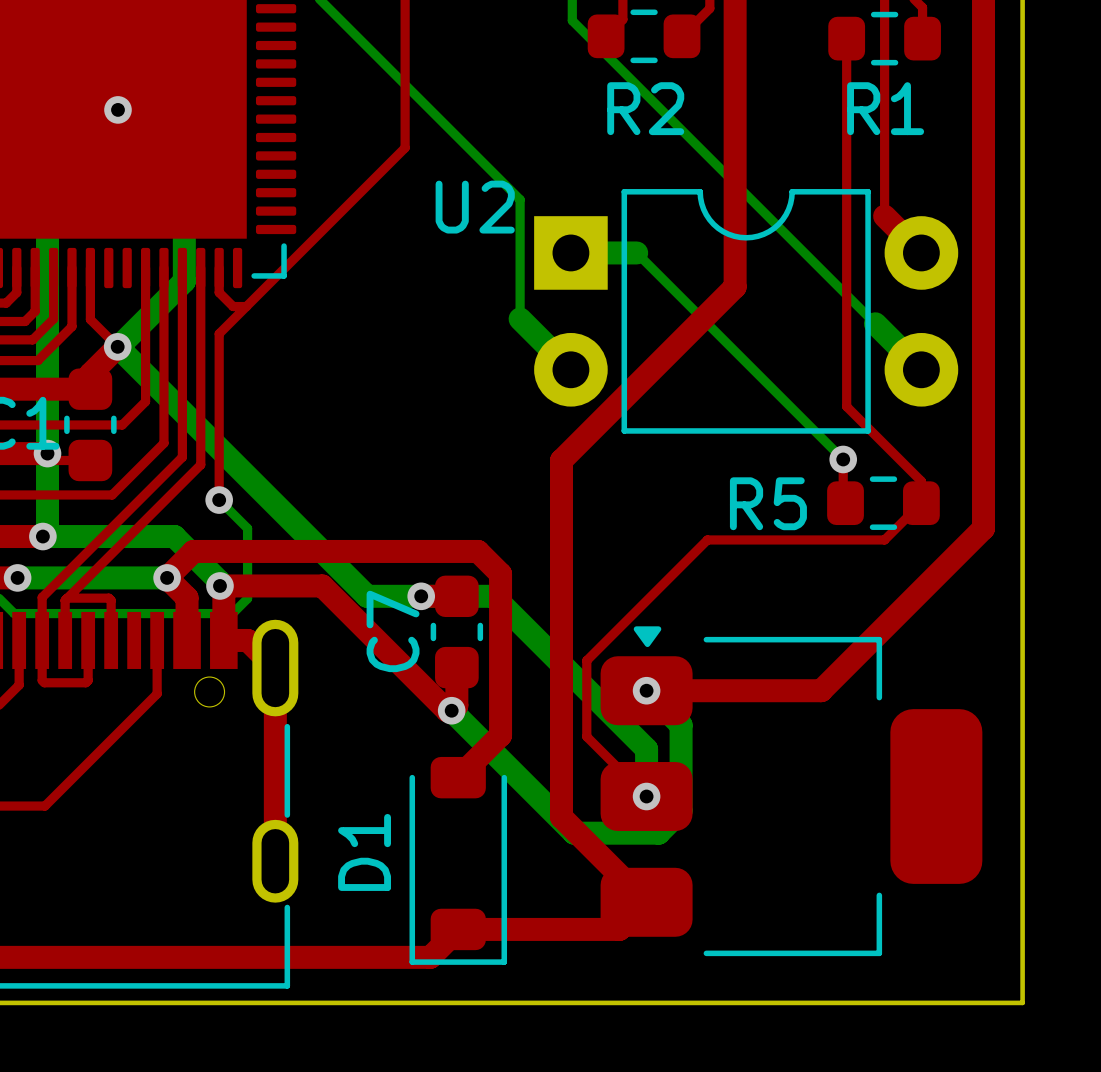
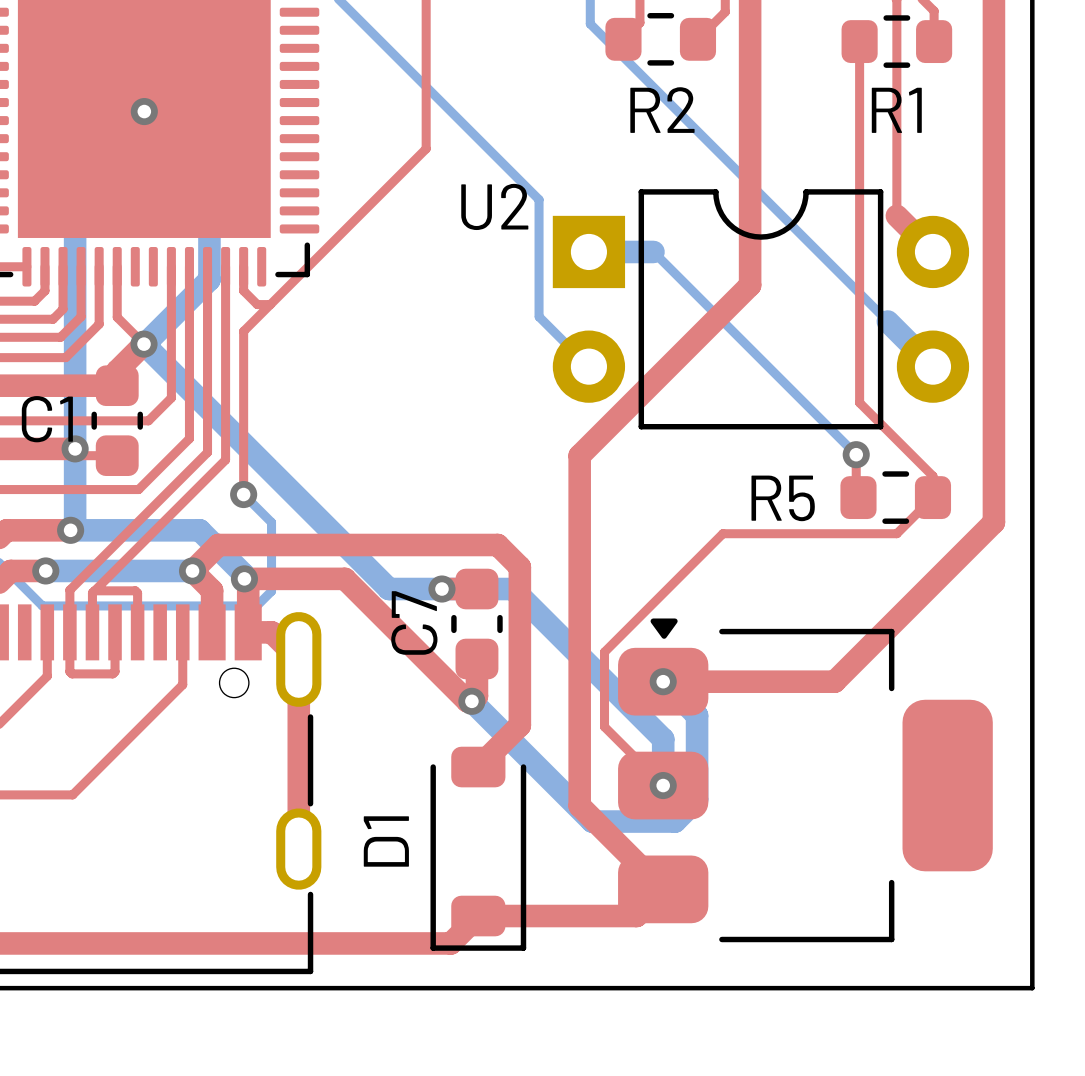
bottom track width: thick (520, 318) (570, 369) -> thin (539, 316) (588, 366)

